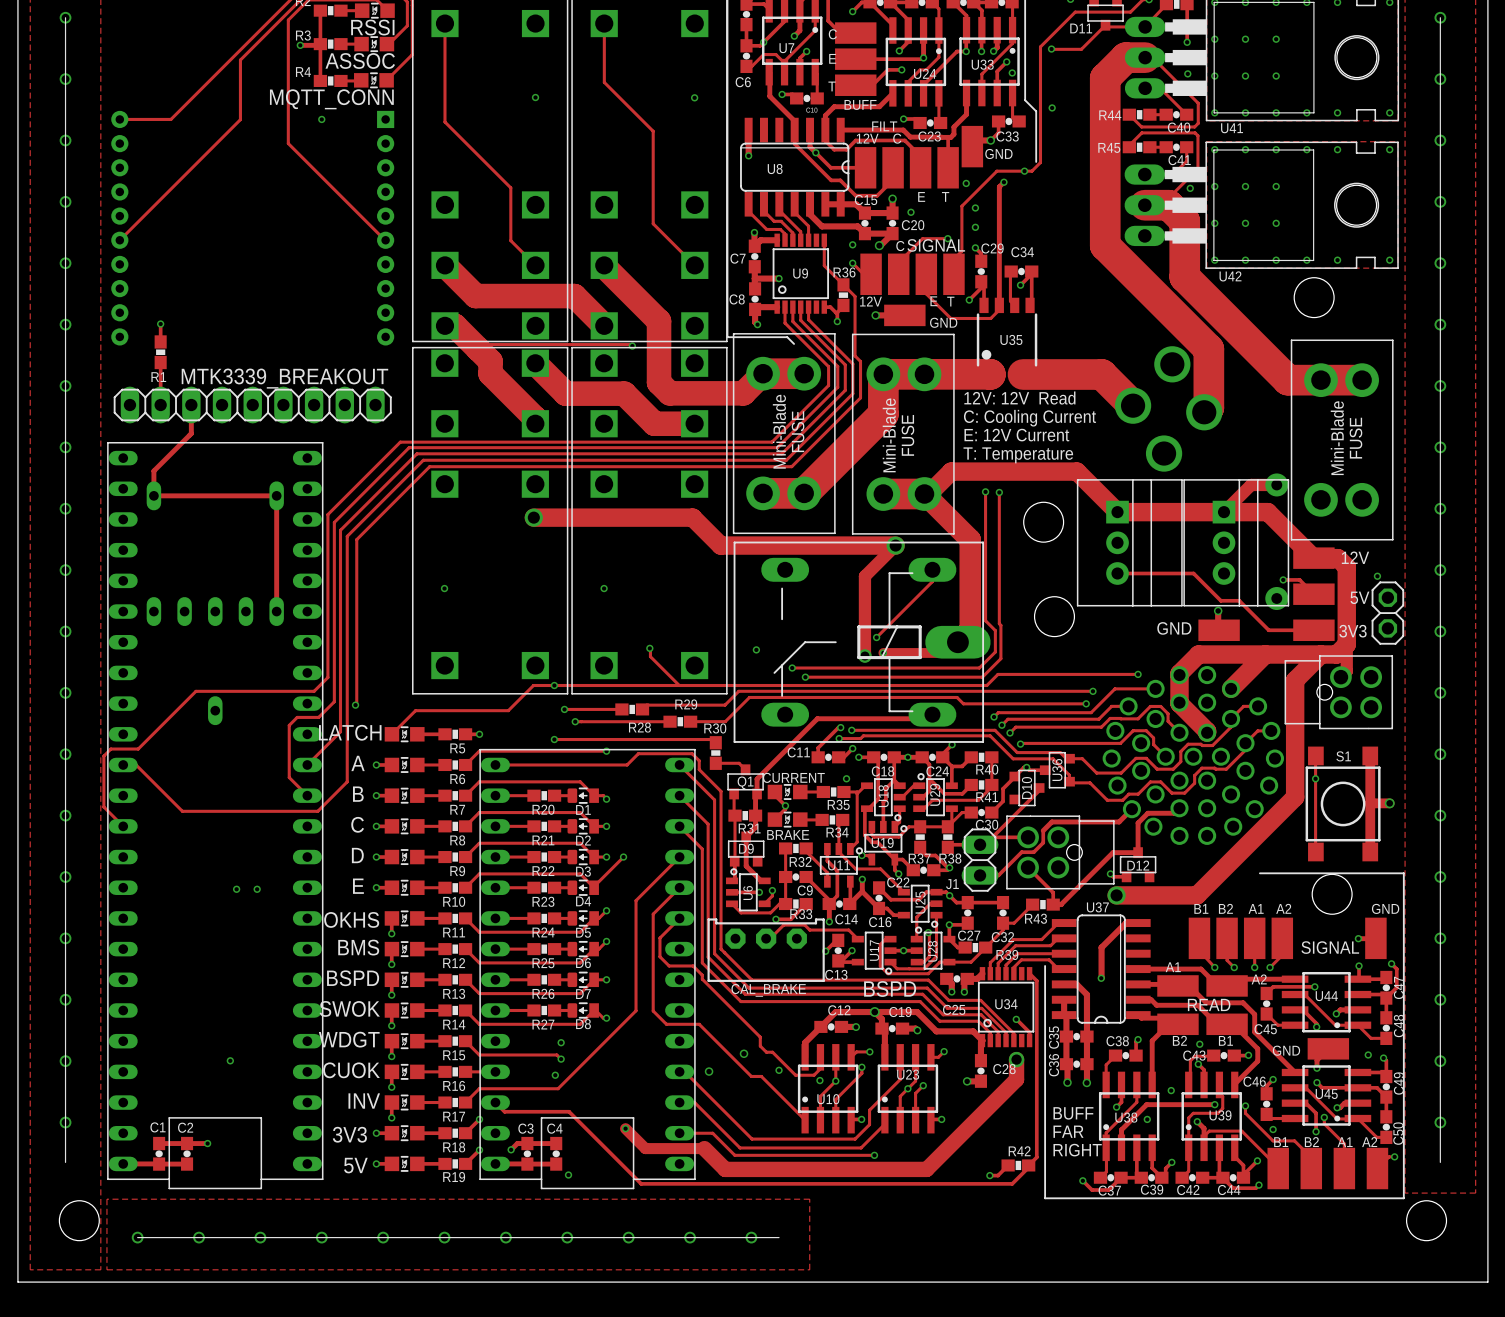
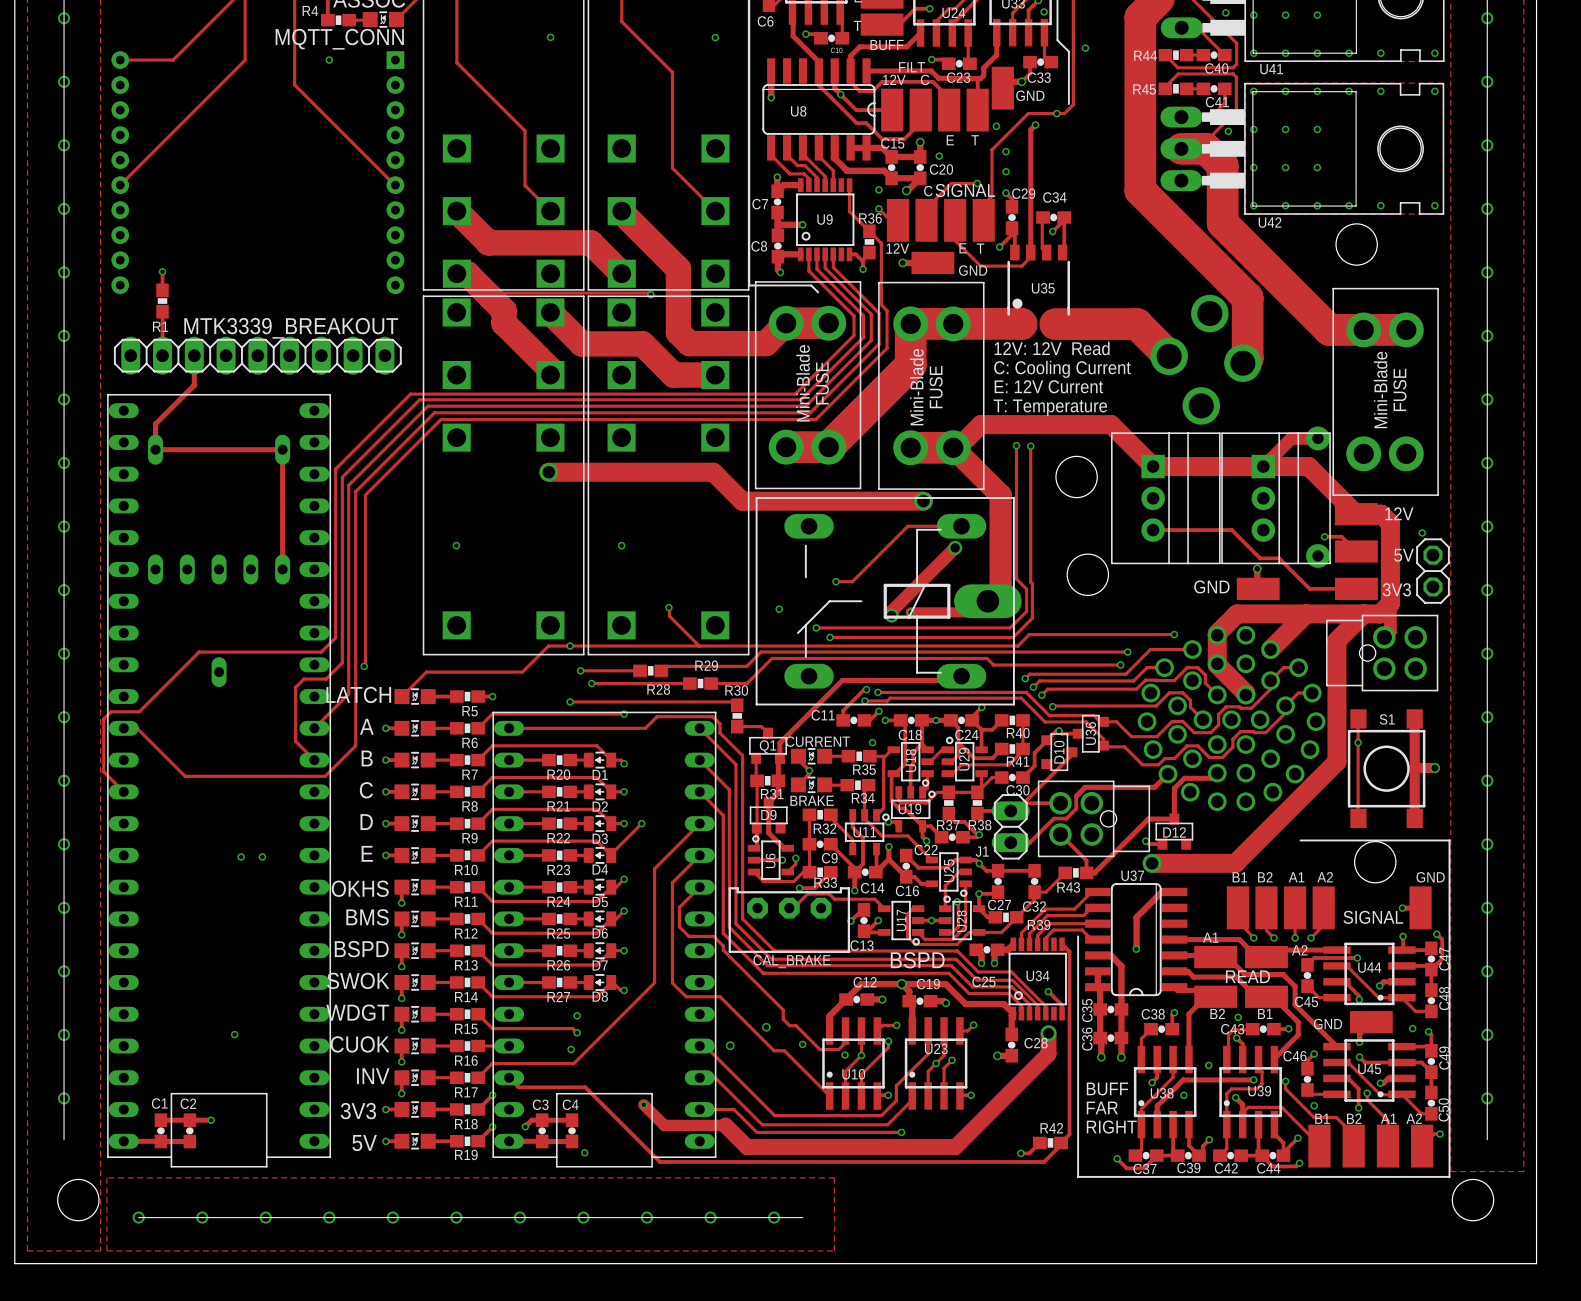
track: (895, 545) (864, 576) (864, 652) -> (955, 547) (891, 611)
track: (932, 569) (932, 581) (876, 637) -> (961, 526) (907, 526) (852, 581) (836, 581)
via: none -> (955, 547)
via position: (876, 637) -> (836, 581)

